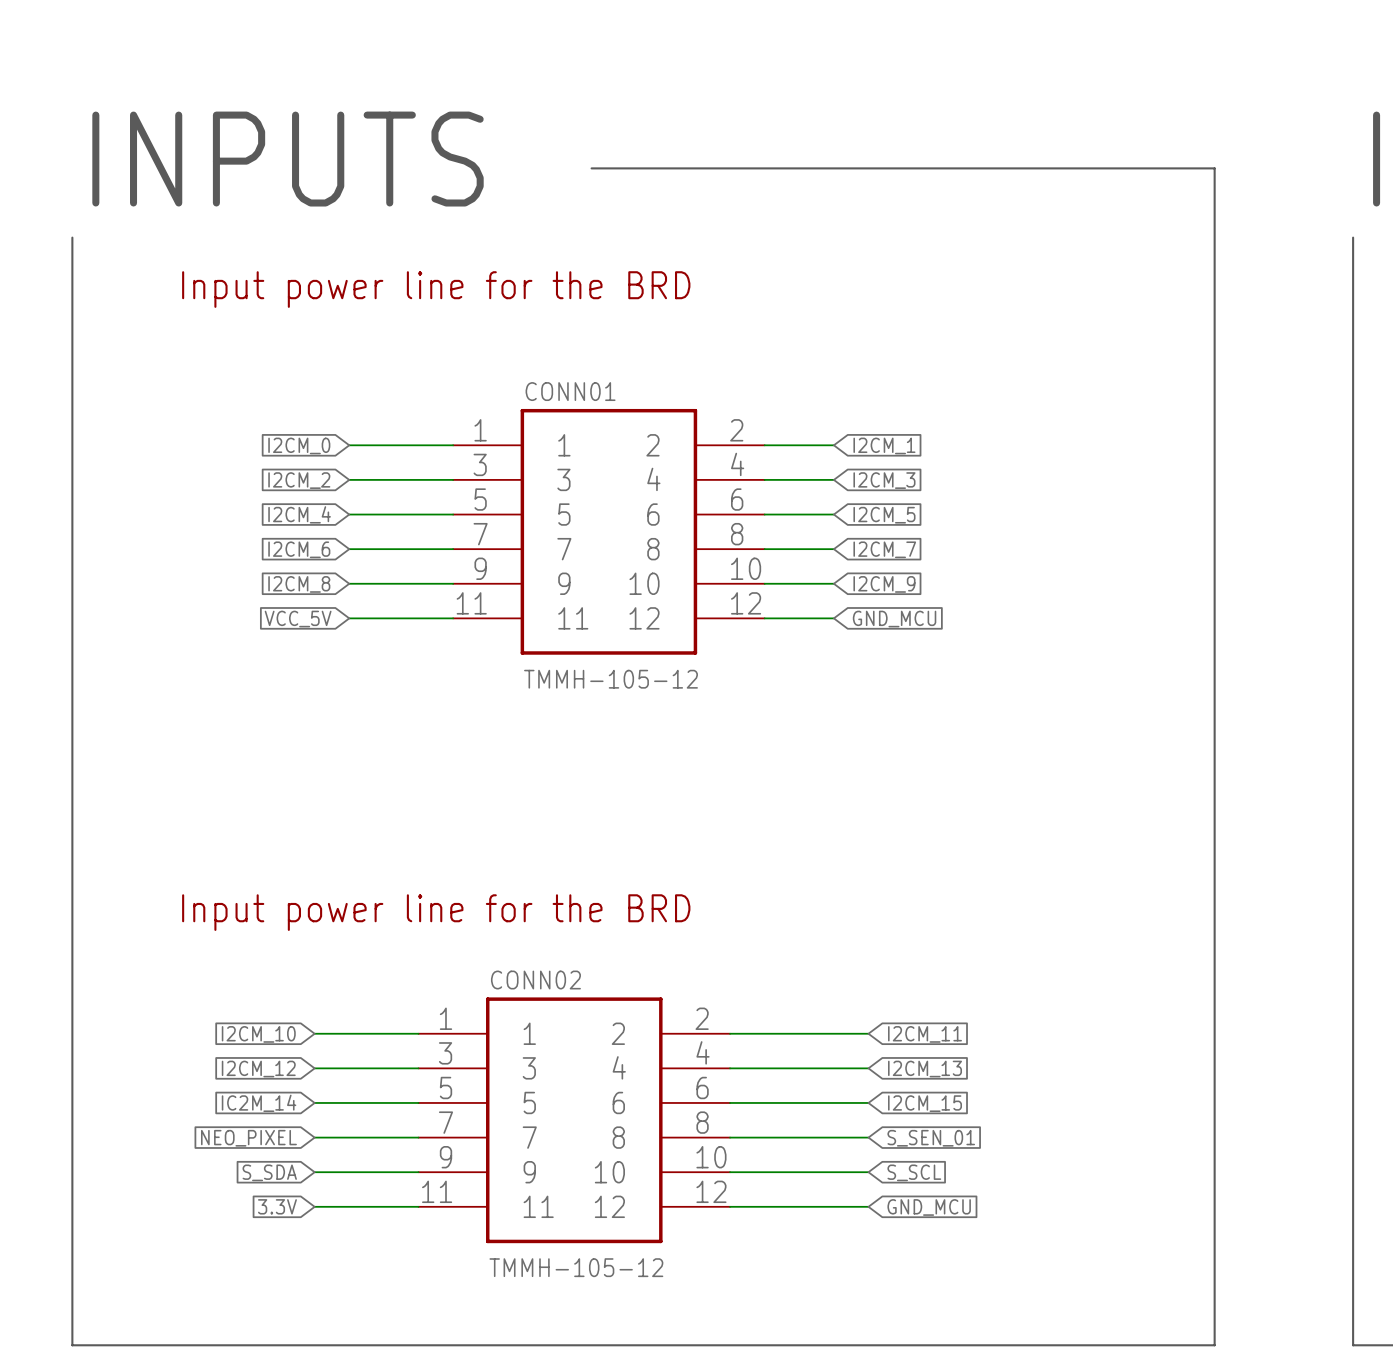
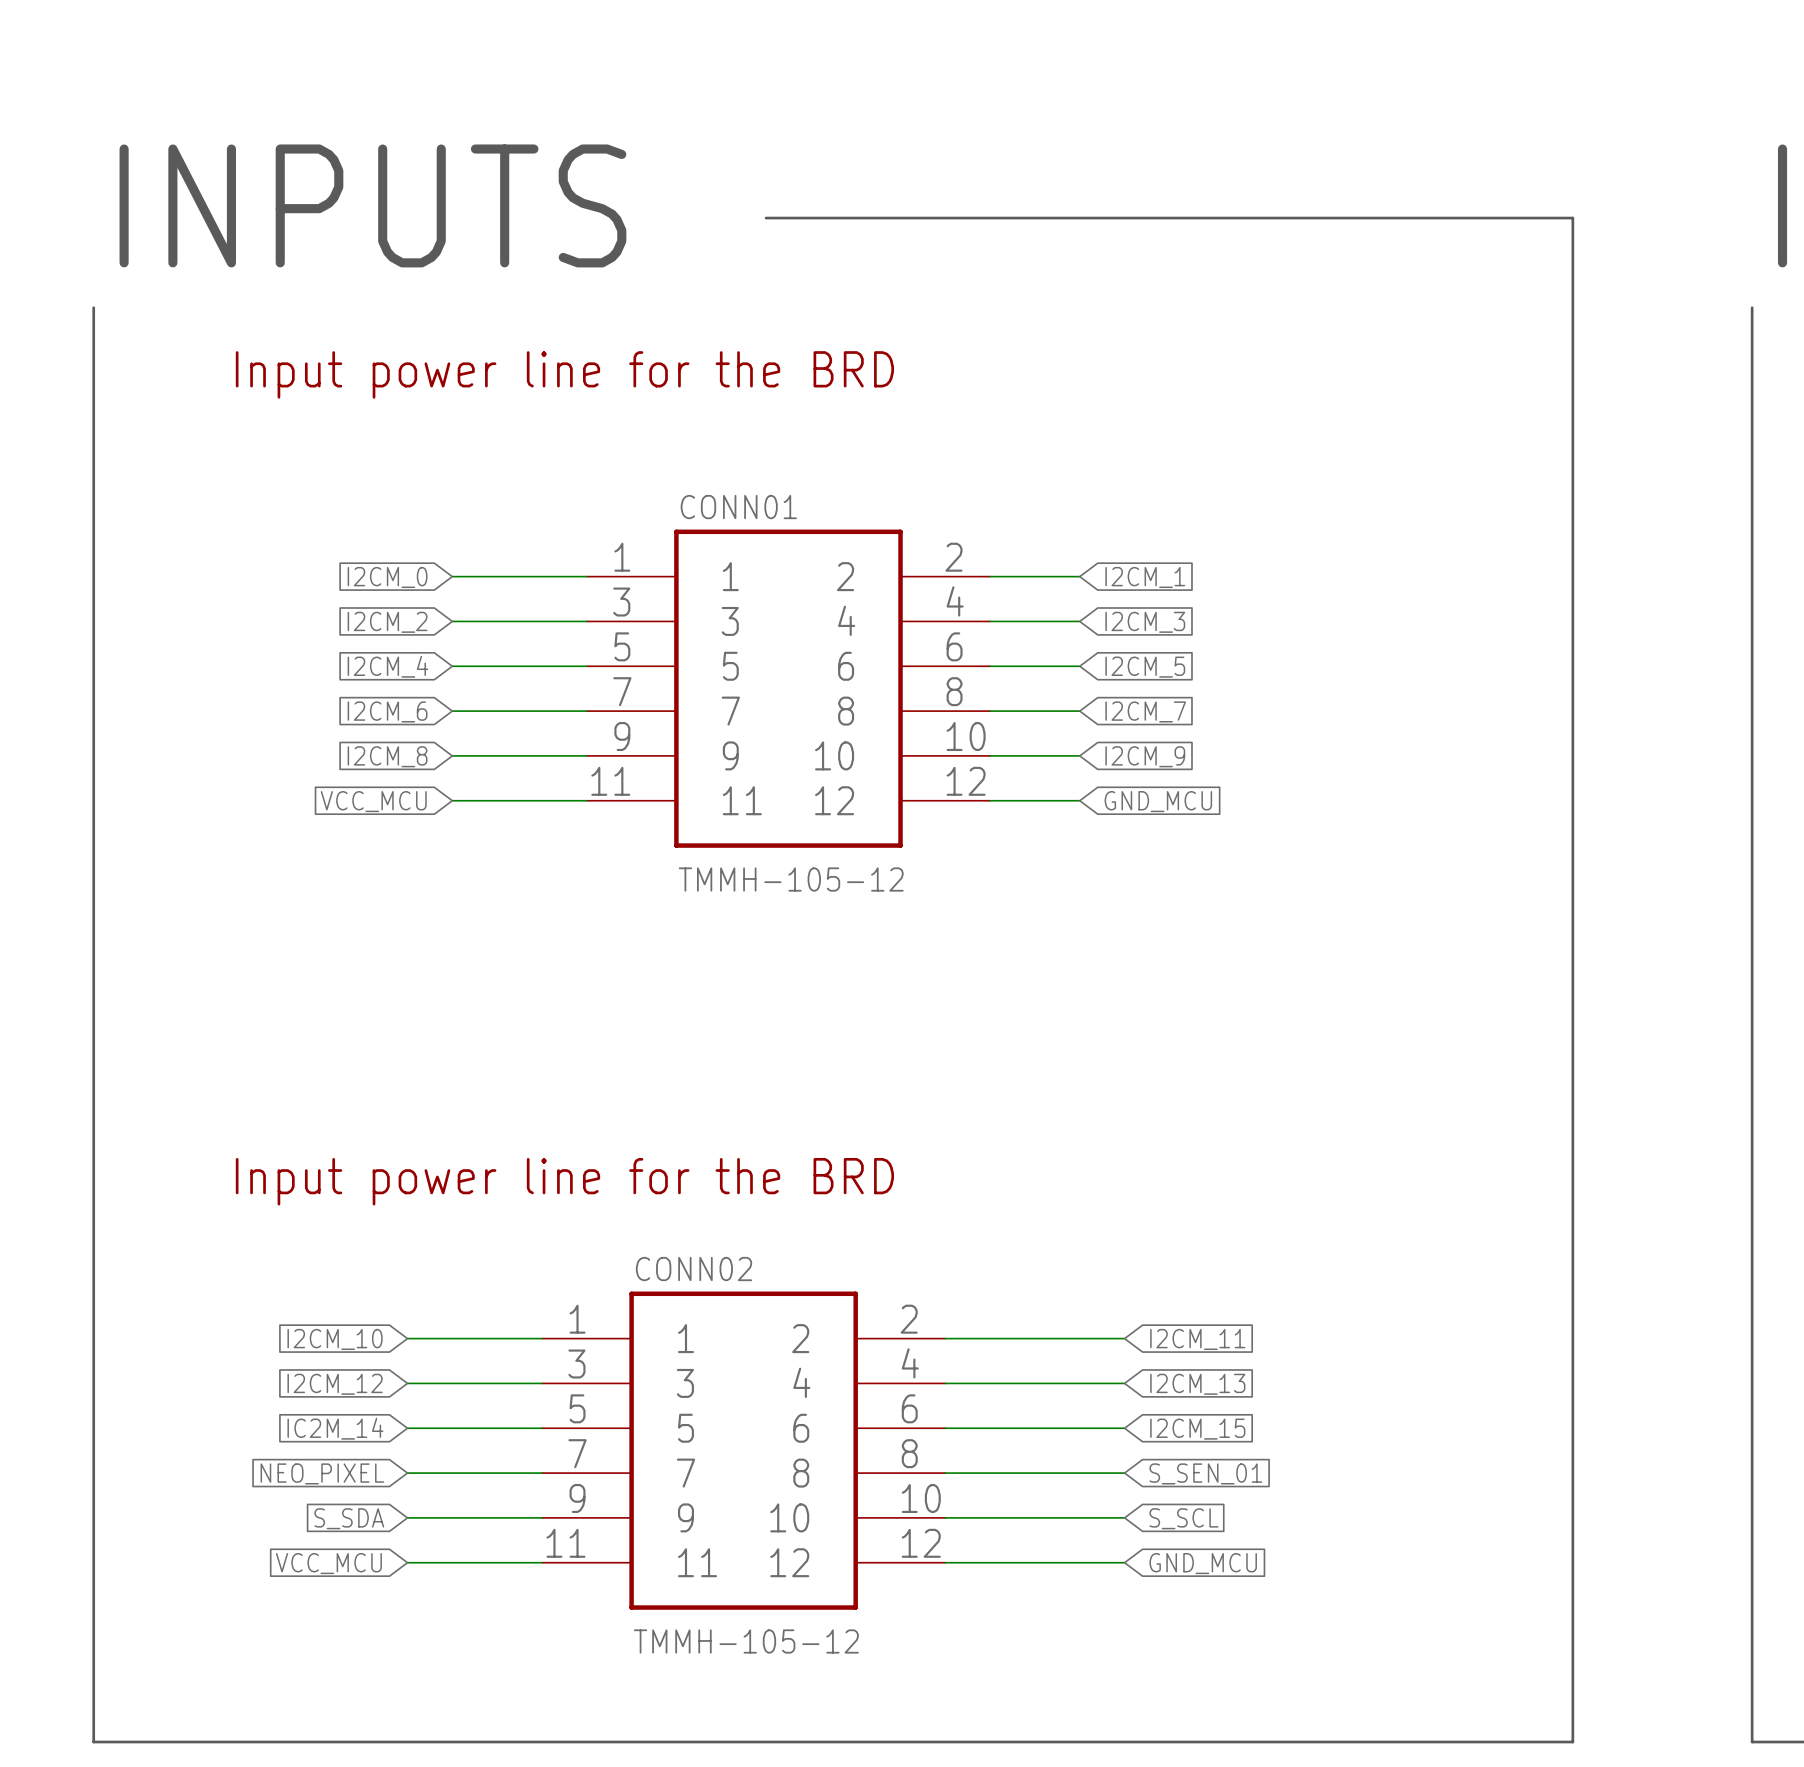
global label: VCC_5V (298, 619) -> VCC_MCU (373, 801)
global label: 3.3V (277, 1206) -> VCC_MCU (328, 1563)

